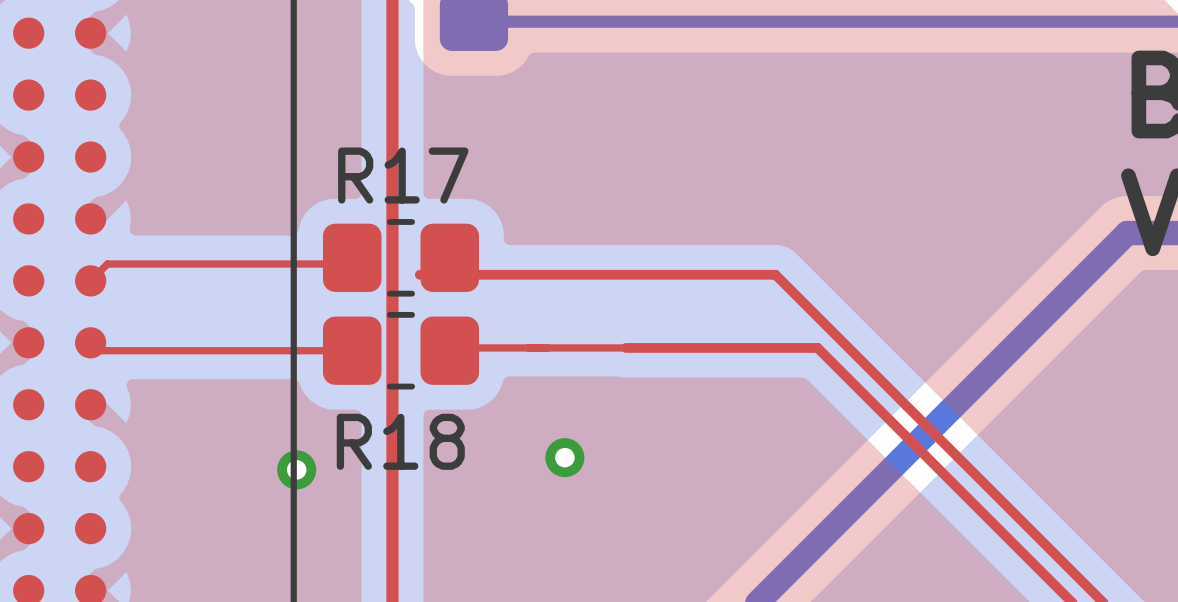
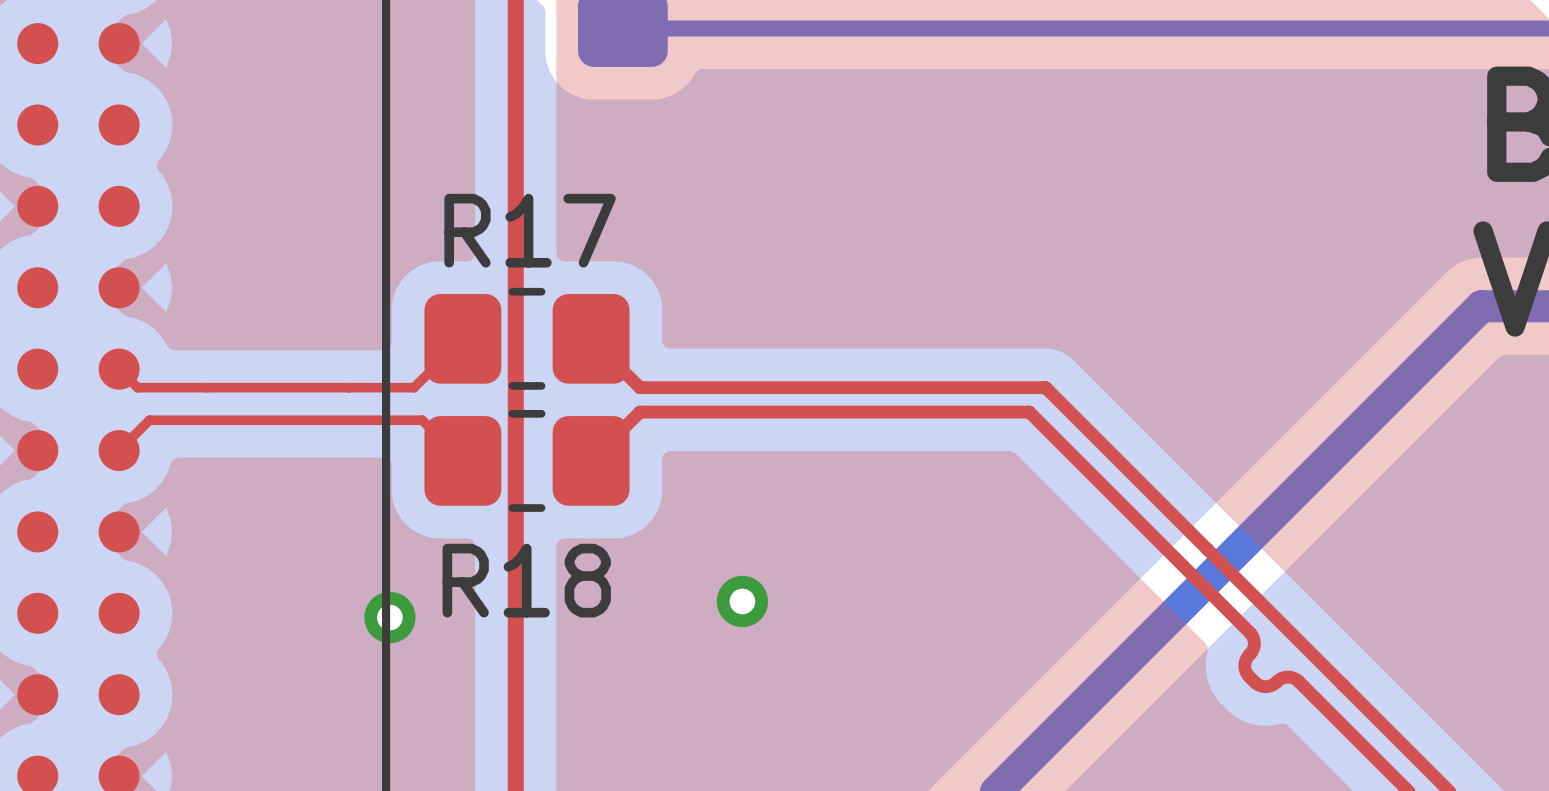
top track: (346, 264) (107, 264) (90, 280) -> (454, 346) (414, 387) (137, 387) (119, 369)
top track: (419, 274) (775, 274) (795, 294) -> (591, 338) (639, 387) (1045, 387)
top track: (90, 342) (98, 350) (352, 350) -> (119, 450) (149, 420) (422, 420) (462, 460)
top track: (439, 347) (817, 347) -> (591, 460) (639, 412) (1029, 412) (1074, 457)
top track: (951, 481) (988, 518) -> (1277, 681) (1287, 677) (1298, 681)
top track: none -> (1249, 632) (1254, 643) (1249, 654)
top track: none -> (1249, 654) (1245, 661) (1245, 669) (1254, 682) (1265, 686) (1276, 682)

